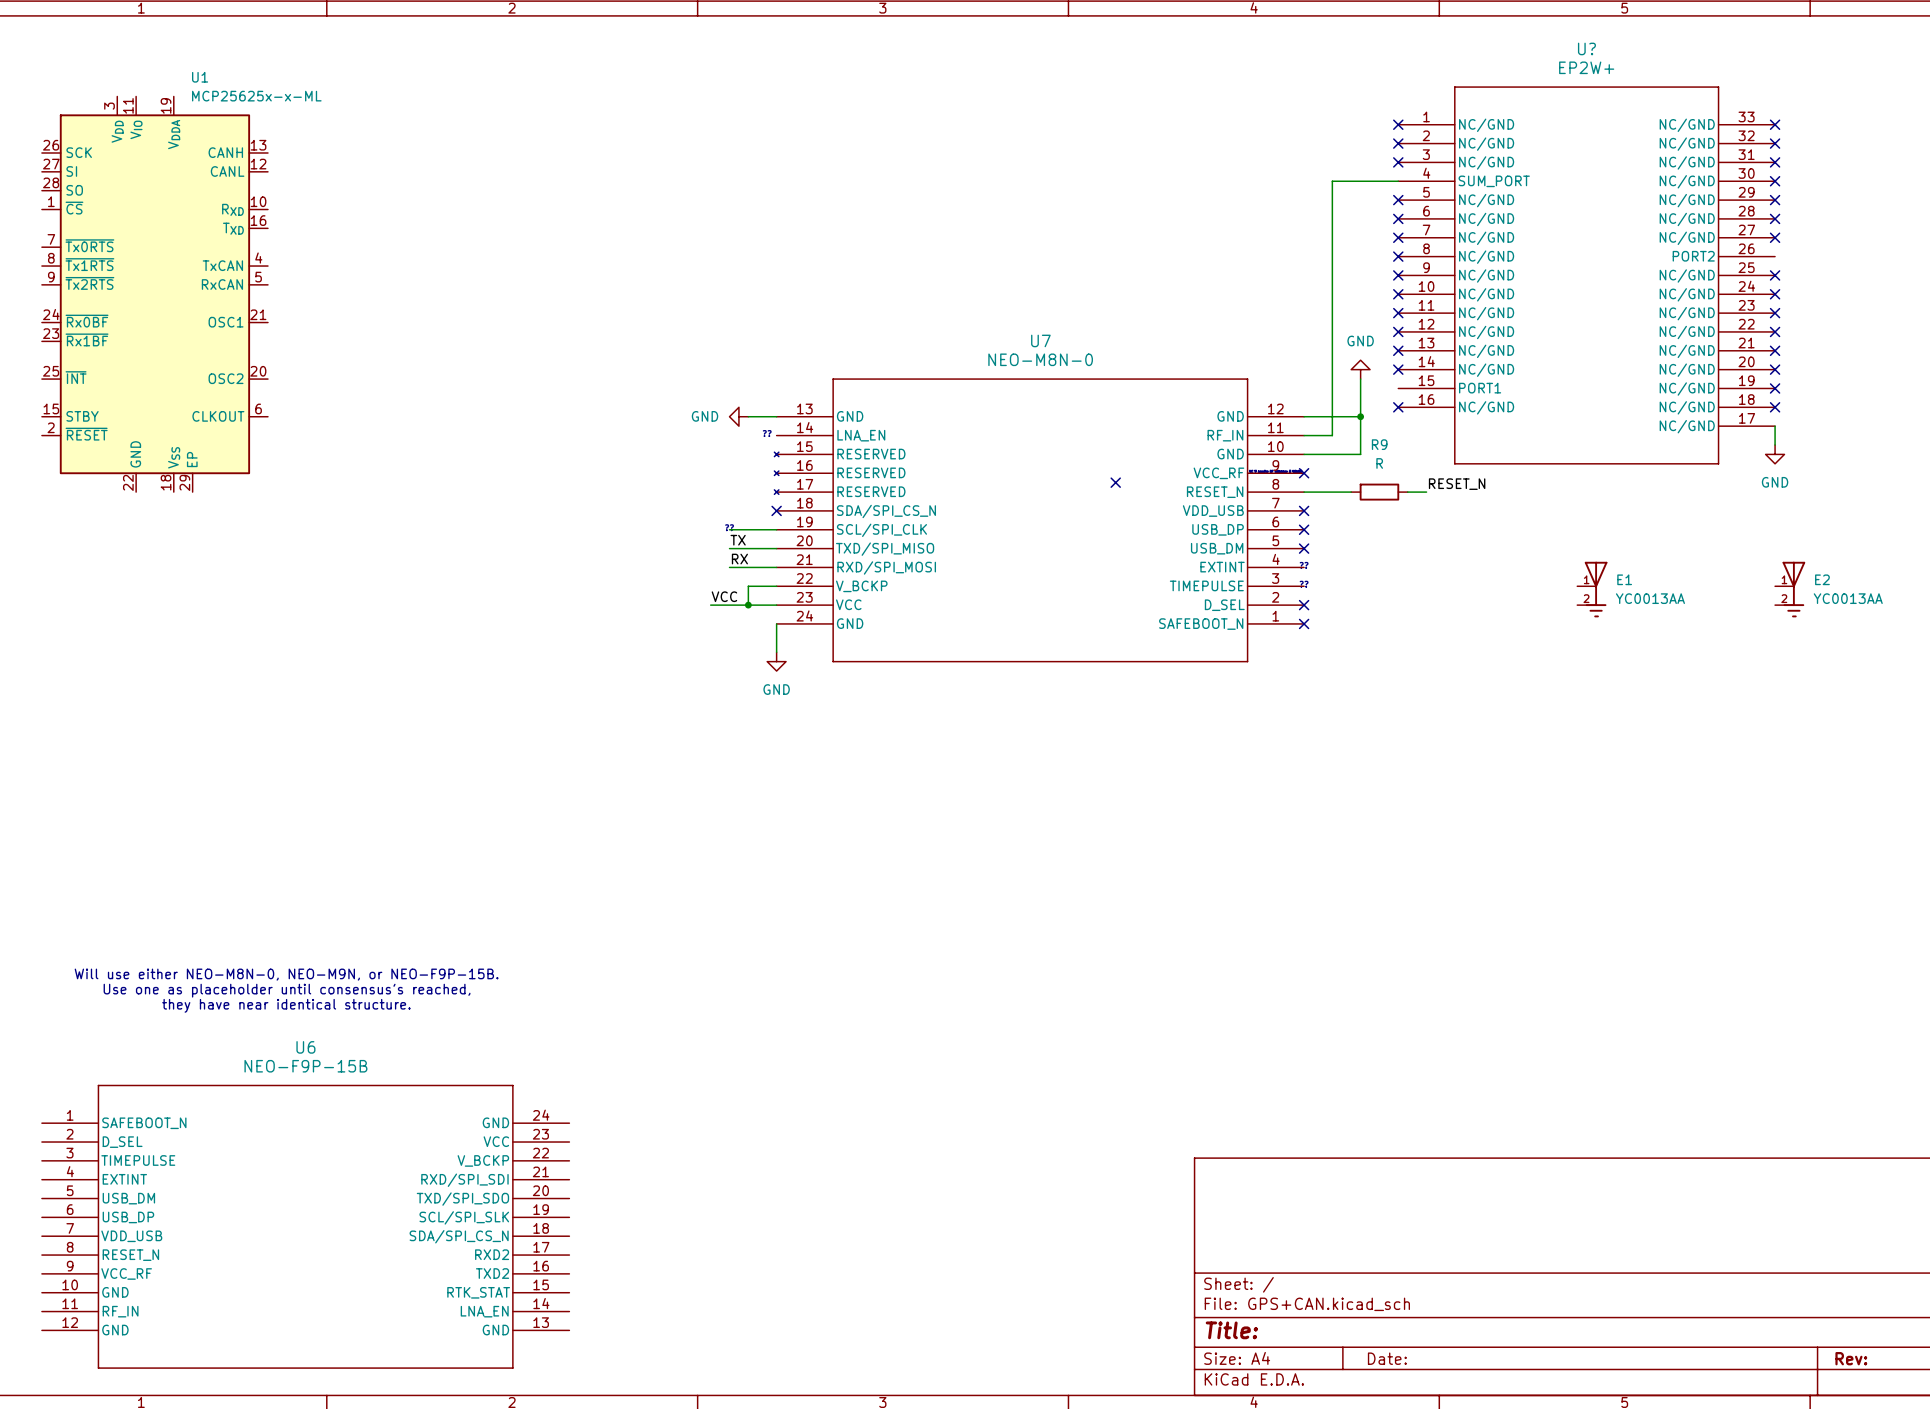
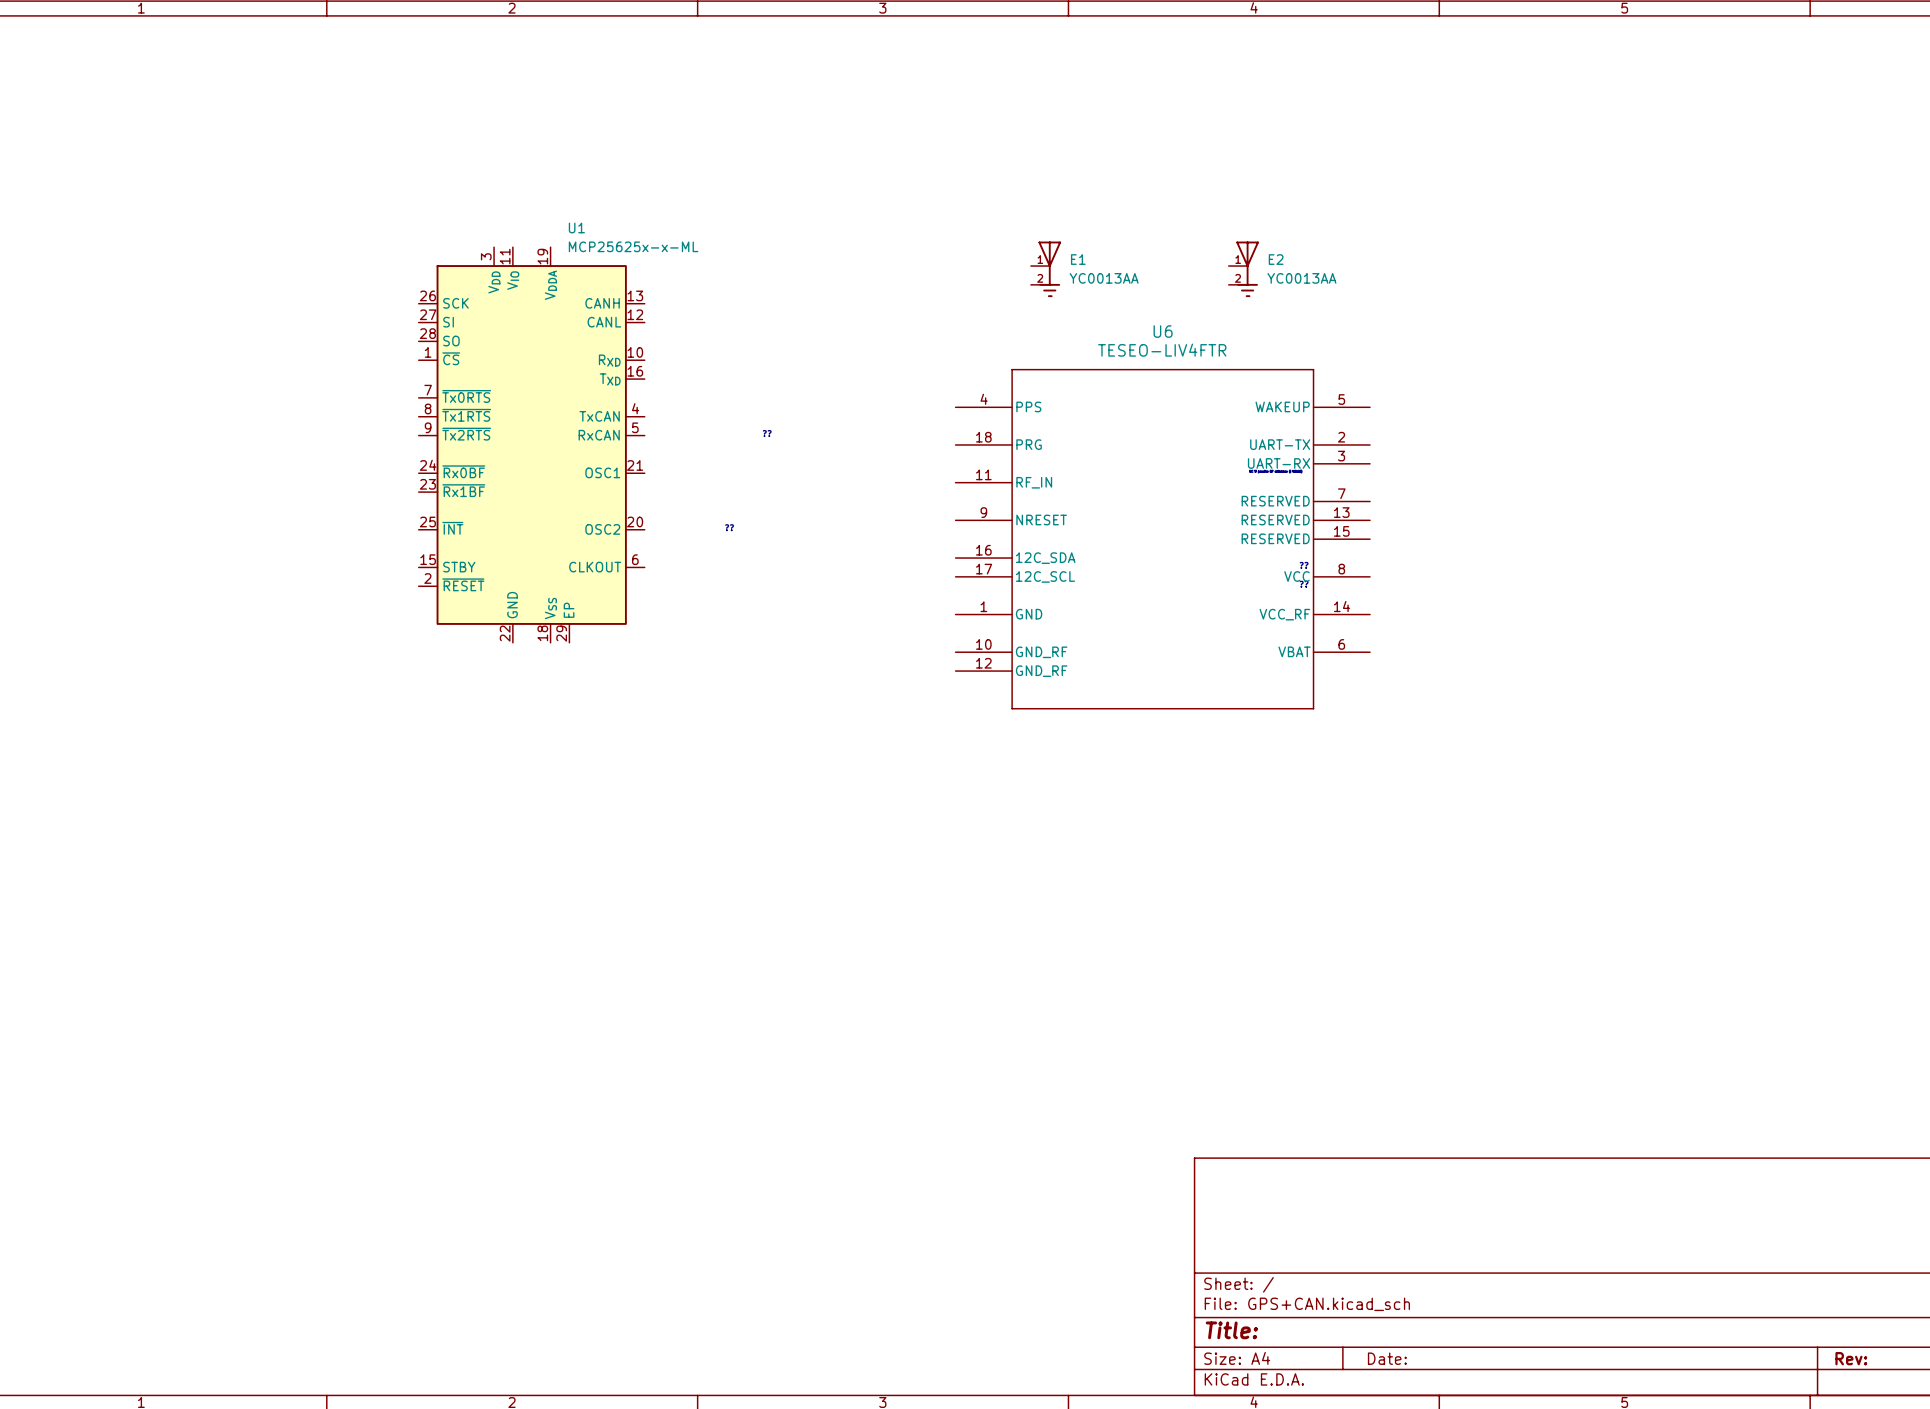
no-connect mark: (1398, 124) -> none
no-connect mark: (1775, 124) -> none
no-connect mark: (1398, 143) -> none
no-connect mark: (1775, 143) -> none
no-connect mark: (1398, 162) -> none
no-connect mark: (1775, 162) -> none
wire: (1398, 181) (1332, 181) (1332, 435) (1304, 435) -> none
no-connect mark: (1775, 181) -> none
no-connect mark: (1398, 200) -> none
no-connect mark: (1775, 200) -> none
no-connect mark: (1398, 218) -> none
no-connect mark: (1775, 218) -> none
no-connect mark: (1398, 237) -> none
no-connect mark: (1775, 237) -> none
no-connect mark: (1398, 256) -> none
no-connect mark: (1398, 275) -> none
U?: EP2W+ (1586, 275) -> none
no-connect mark: (1775, 275) -> none
U1 position: (154, 294) -> (531, 444)
no-connect mark: (1398, 294) -> none
no-connect mark: (1775, 294) -> none
no-connect mark: (1398, 313) -> none
no-connect mark: (1775, 313) -> none
no-connect mark: (1398, 331) -> none
no-connect mark: (1775, 331) -> none
no-connect mark: (1398, 350) -> none
no-connect mark: (1775, 350) -> none
power symbol: GND (1360, 369) -> none
no-connect mark: (1398, 369) -> none
no-connect mark: (1775, 369) -> none
wire: (1360, 379) (1360, 454) (1304, 454) -> none
no-connect mark: (1775, 388) -> none
no-connect mark: (1398, 407) -> none
no-connect mark: (1775, 407) -> none
power symbol: GND (738, 416) -> none
wire: (748, 416) (776, 416) -> none
wire: (1304, 416) (1360, 416) -> none
junction: (1360, 416) -> none
wire: (1775, 426) (1775, 444) -> none
power symbol: GND (1775, 454) -> none
no-connect mark: (1304, 473) -> none
no-connect mark: (1115, 482) -> none
label: RESET_N (1457, 484) -> none
wire: (1304, 492) (1351, 492) -> none
R9: R (1379, 492) -> none
wire: (1407, 492) (1426, 492) -> none
no-connect mark: (776, 510) -> none
no-connect mark: (1304, 510) -> none
U7: NEO-M8N-0 (1039, 520) -> none
wire: (729, 529) (776, 529) -> none
no-connect mark: (1304, 529) -> none
label: TX (738, 540) -> none
wire: (729, 548) (776, 548) -> none
no-connect mark: (1304, 548) -> none
label: RX (739, 559) -> none
wire: (729, 567) (776, 567) -> none
wire: (776, 586) (748, 586) (748, 605) -> none
E1 position: (1592, 589) -> (1046, 269)
E2 position: (1790, 589) -> (1243, 269)
label: VCC (724, 596) -> none
wire: (710, 605) (776, 605) -> none
junction: (748, 605) -> none
no-connect mark: (1304, 605) -> none
wire: (776, 623) (776, 652) -> none
no-connect mark: (1304, 623) -> none
power symbol: GND (776, 661) -> none
text: Will use either NEO-M8N-0, NEO-M9N, or NEO-F9P-15B. (286, 974) -> none
text: Use one as placeholder until consensus's reached, (287, 990) -> none
text: they have near identical structure. (286, 1005) -> none
U6 name position: U6 (305, 1047) -> U6 (1163, 331)
U6 value: NEO-F9P-15B (305, 1066) -> TESEO-LIV4FTR (1162, 350)
U6 symbol: [41, 1085, 570, 1369] -> [955, 369, 1371, 709]

